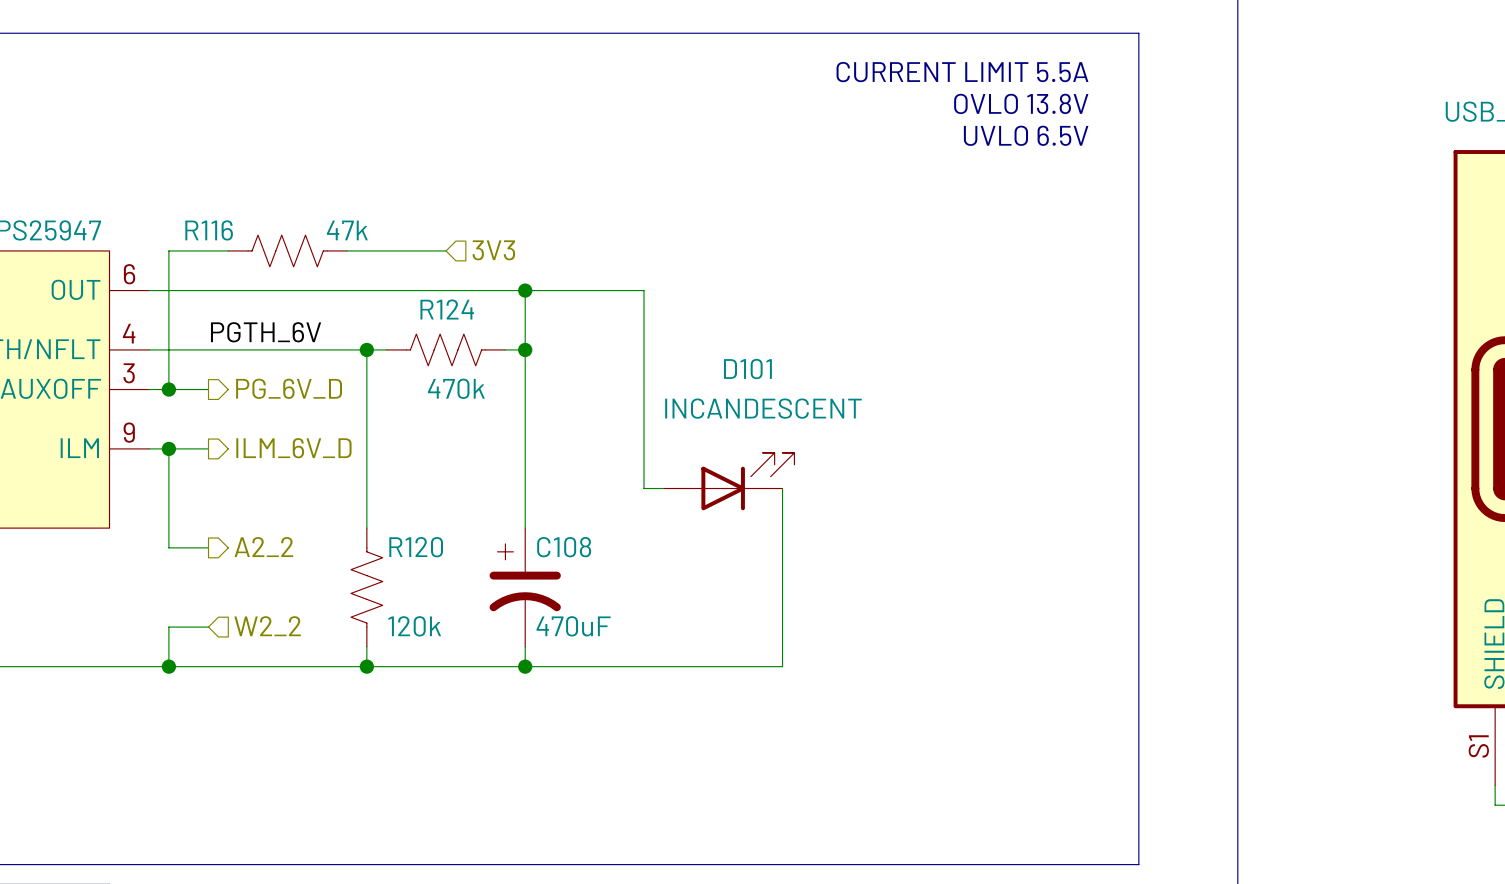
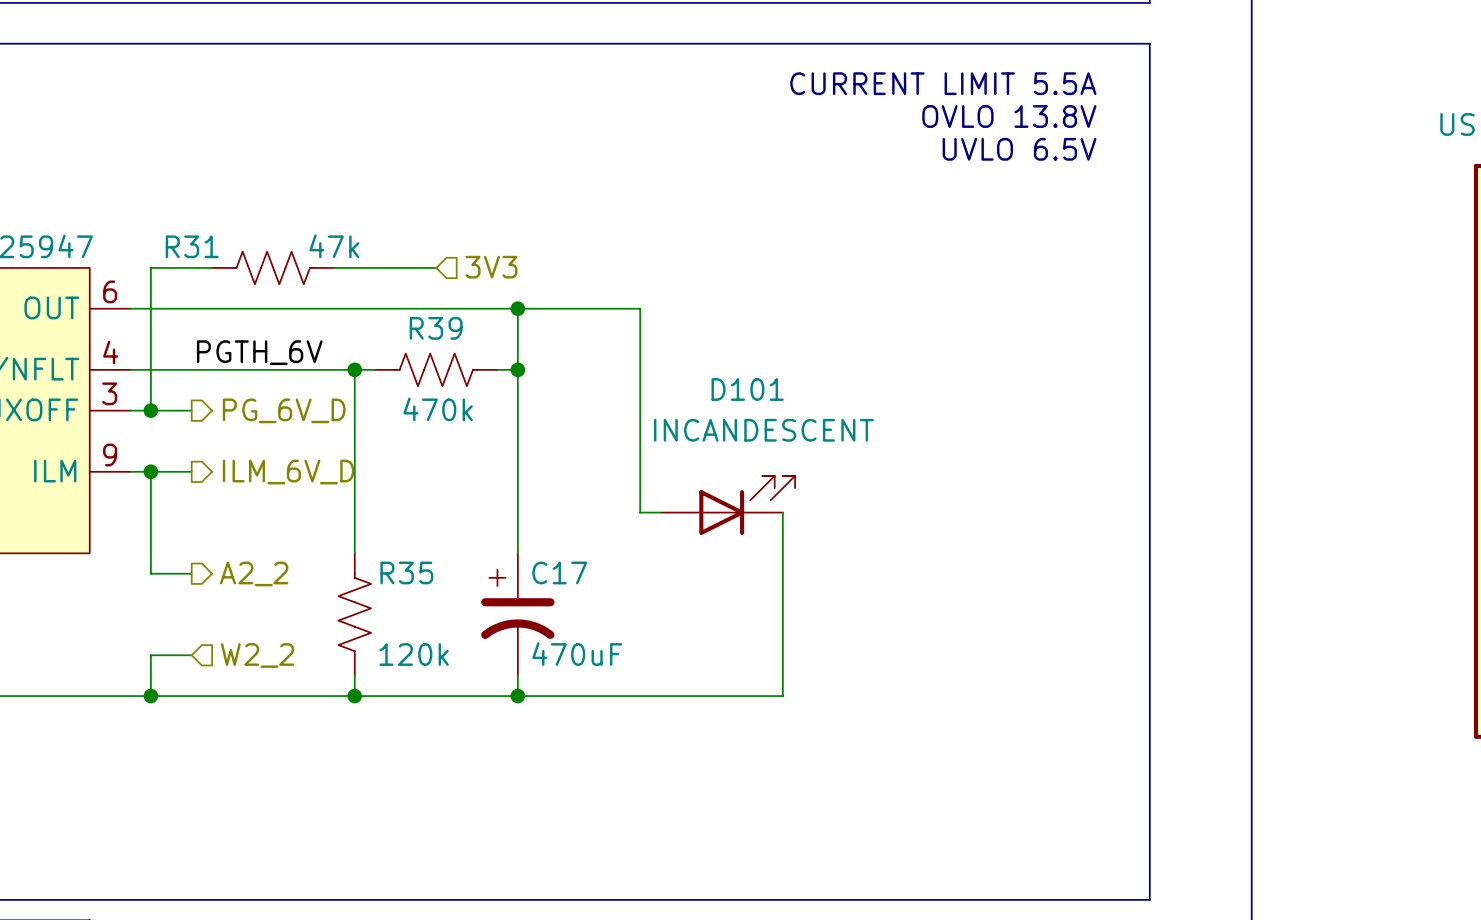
R116 name: R116 (209, 230) -> R31 (192, 246)
R124 name: R124 (447, 309) -> R39 (436, 328)
R120 name: R120 (416, 547) -> R35 (406, 572)
C108 name: C108 (564, 547) -> C17 (559, 572)

